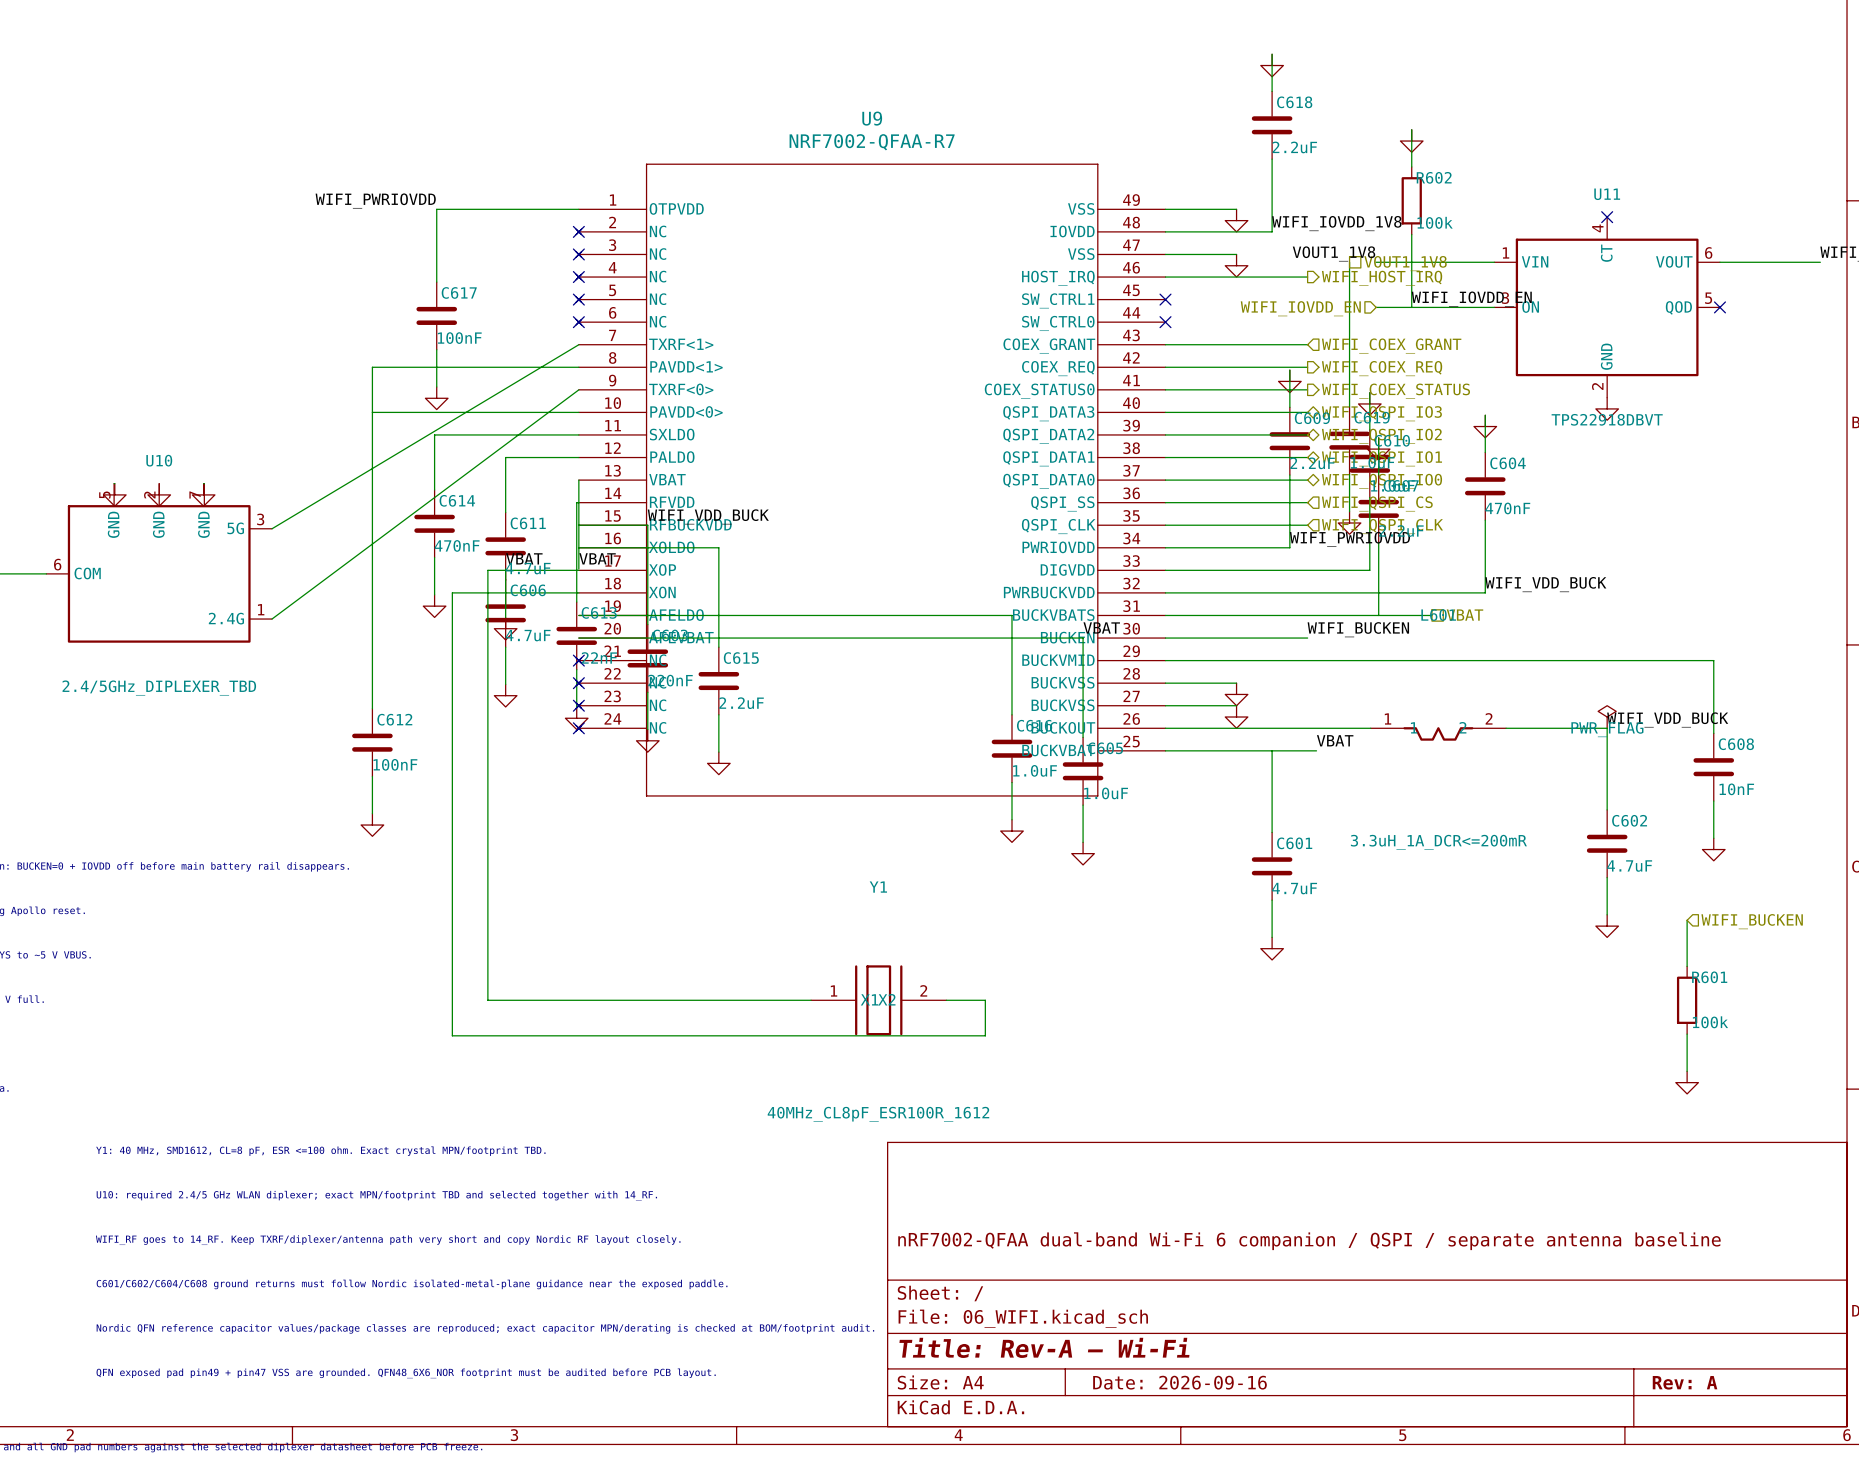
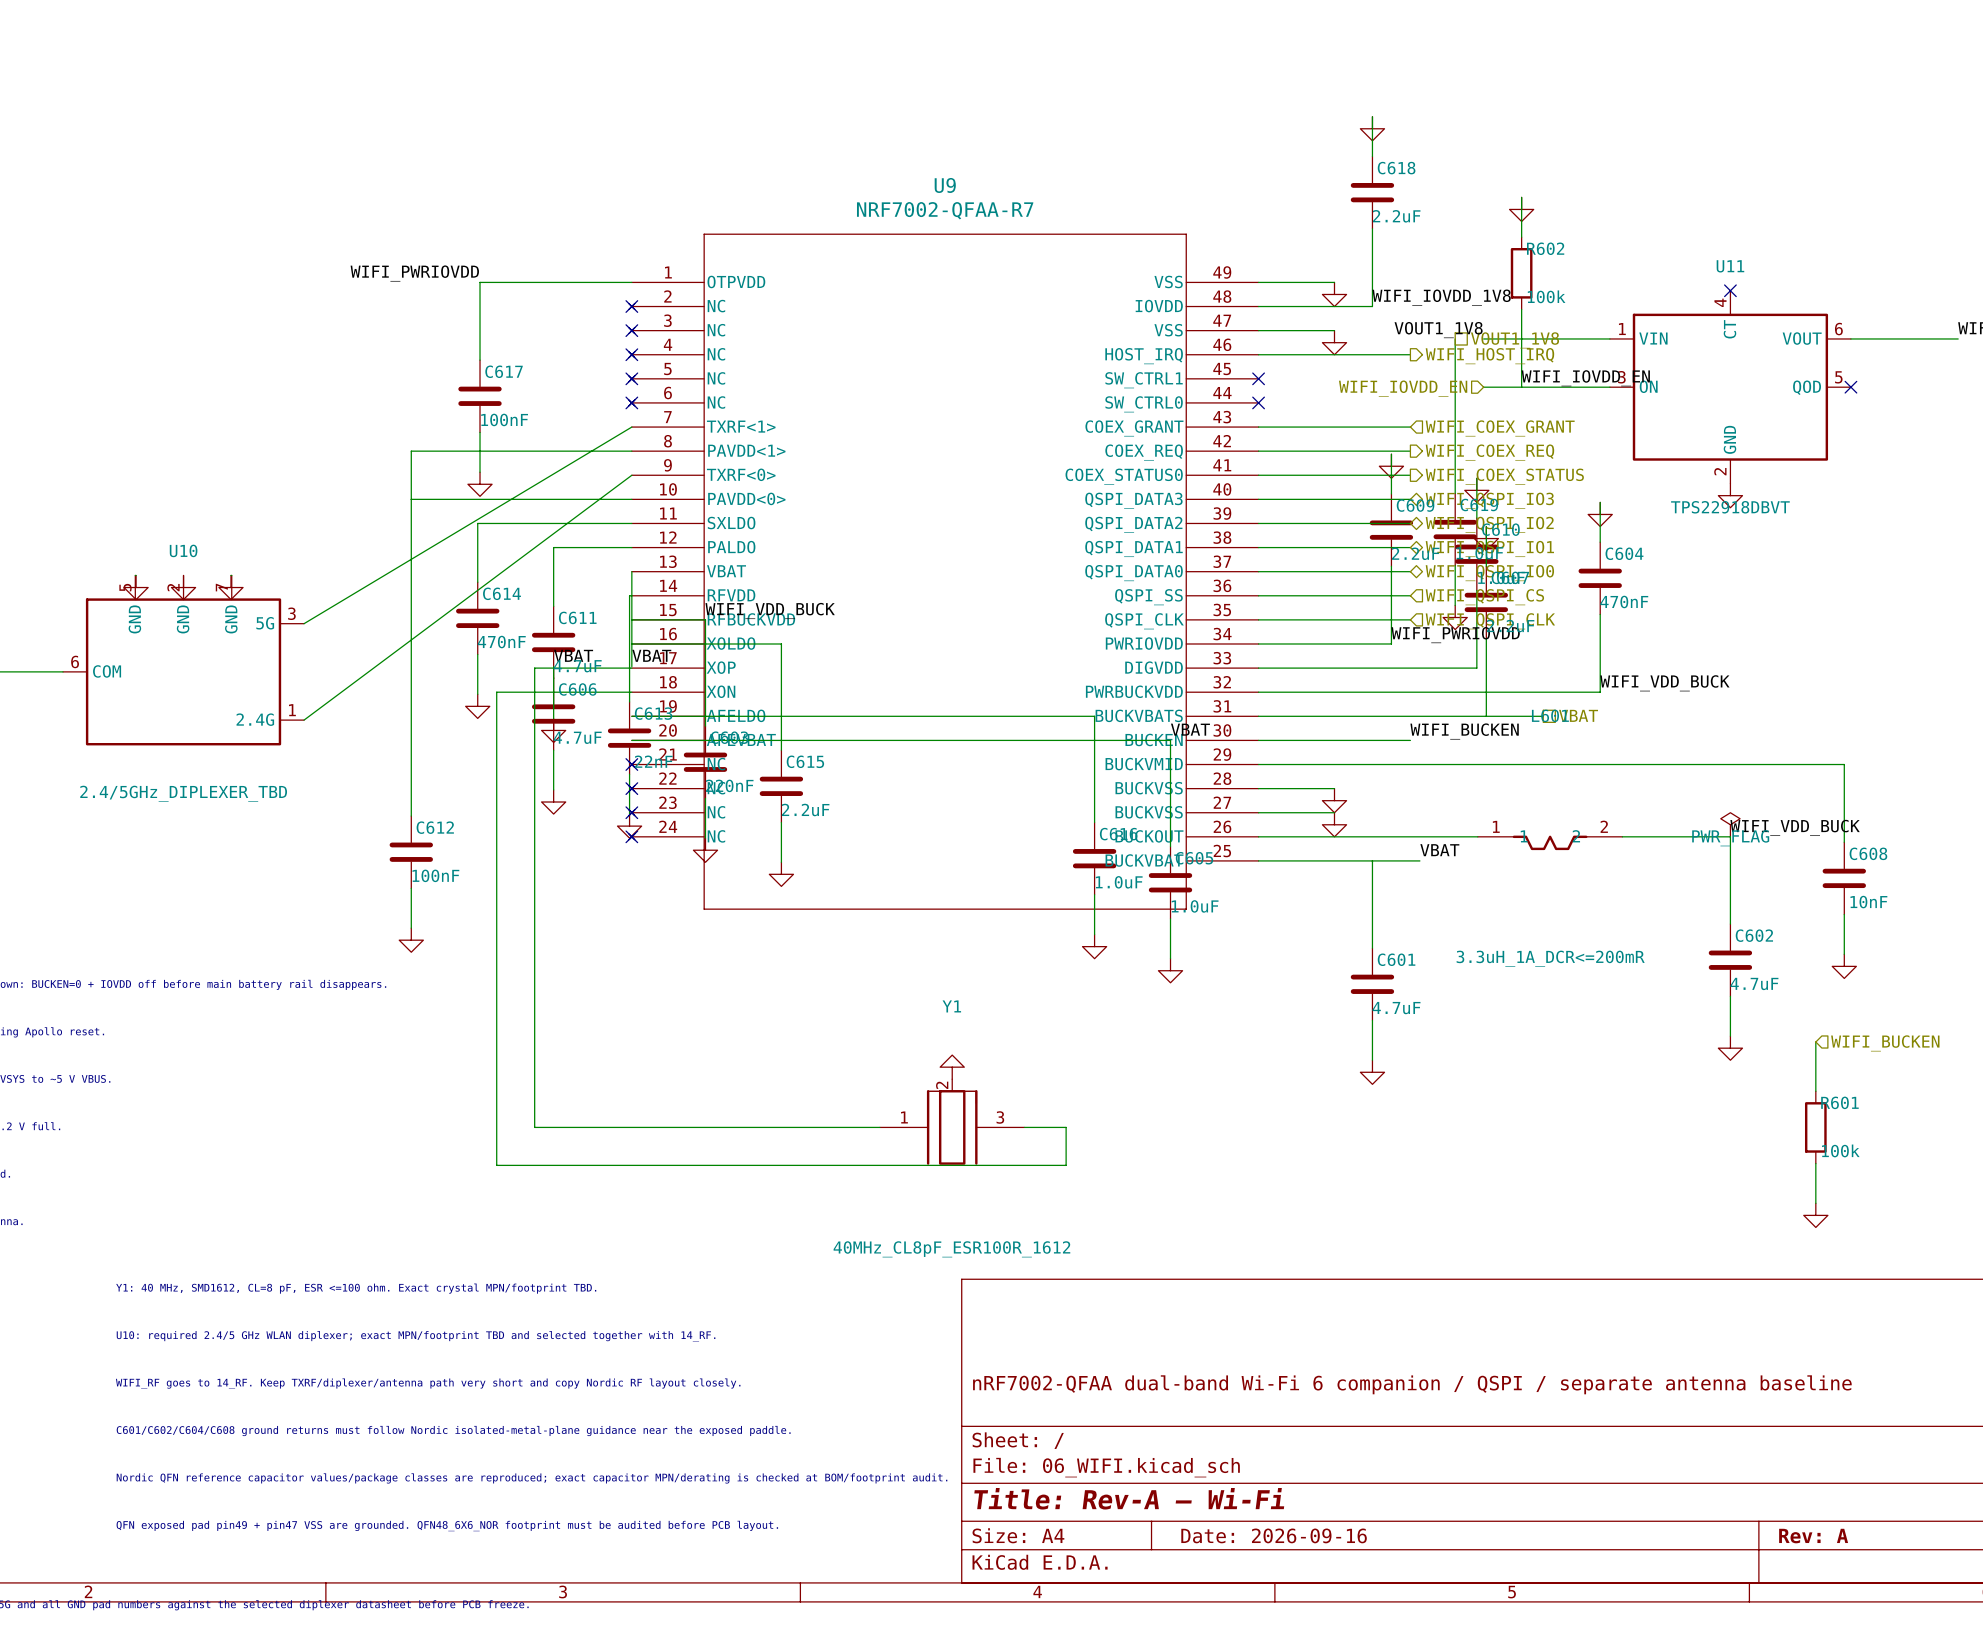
power symbol: none -> (952, 1067)
Y1 symbol: [811, 965, 947, 1036] -> [879, 1079, 1025, 1165]

